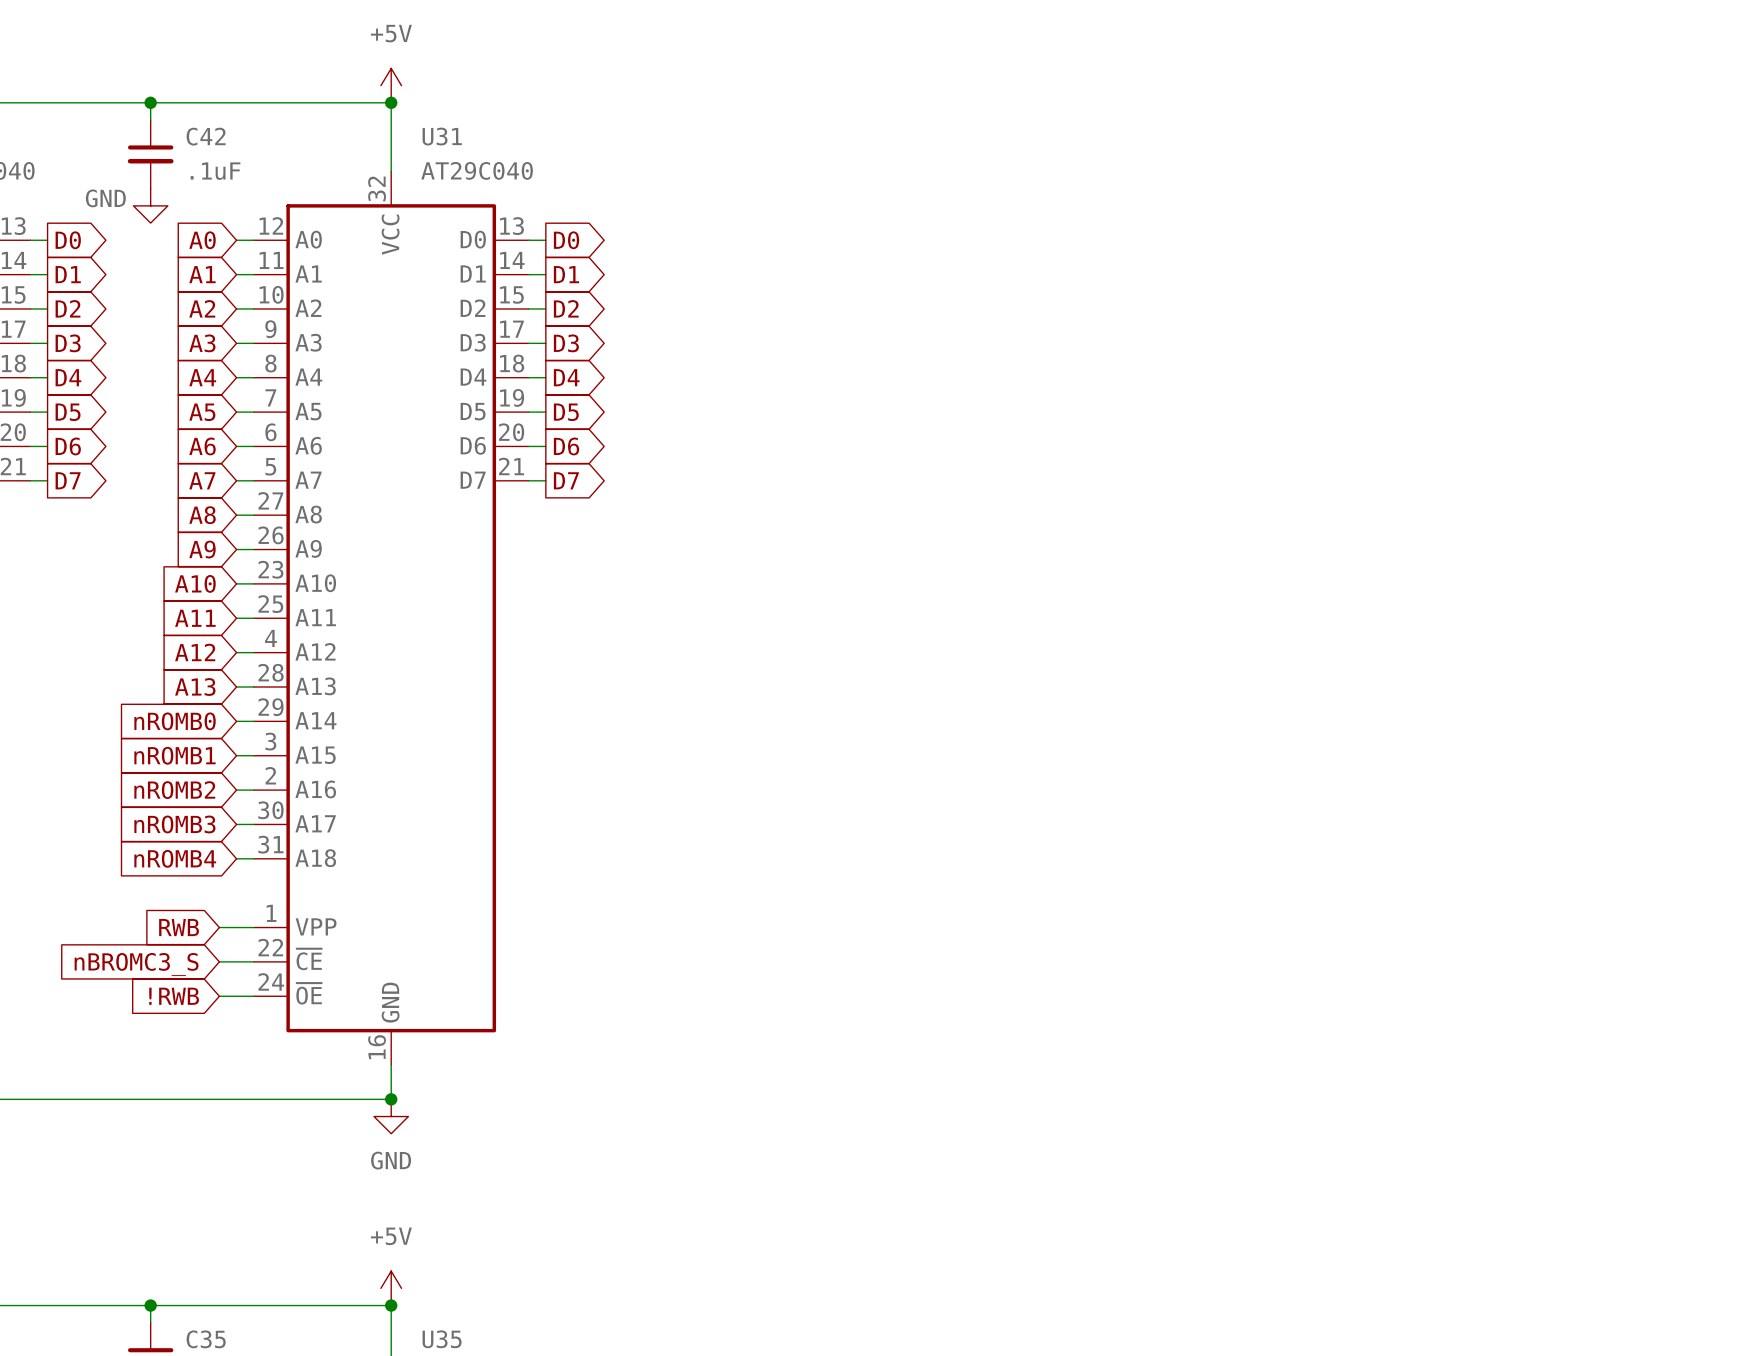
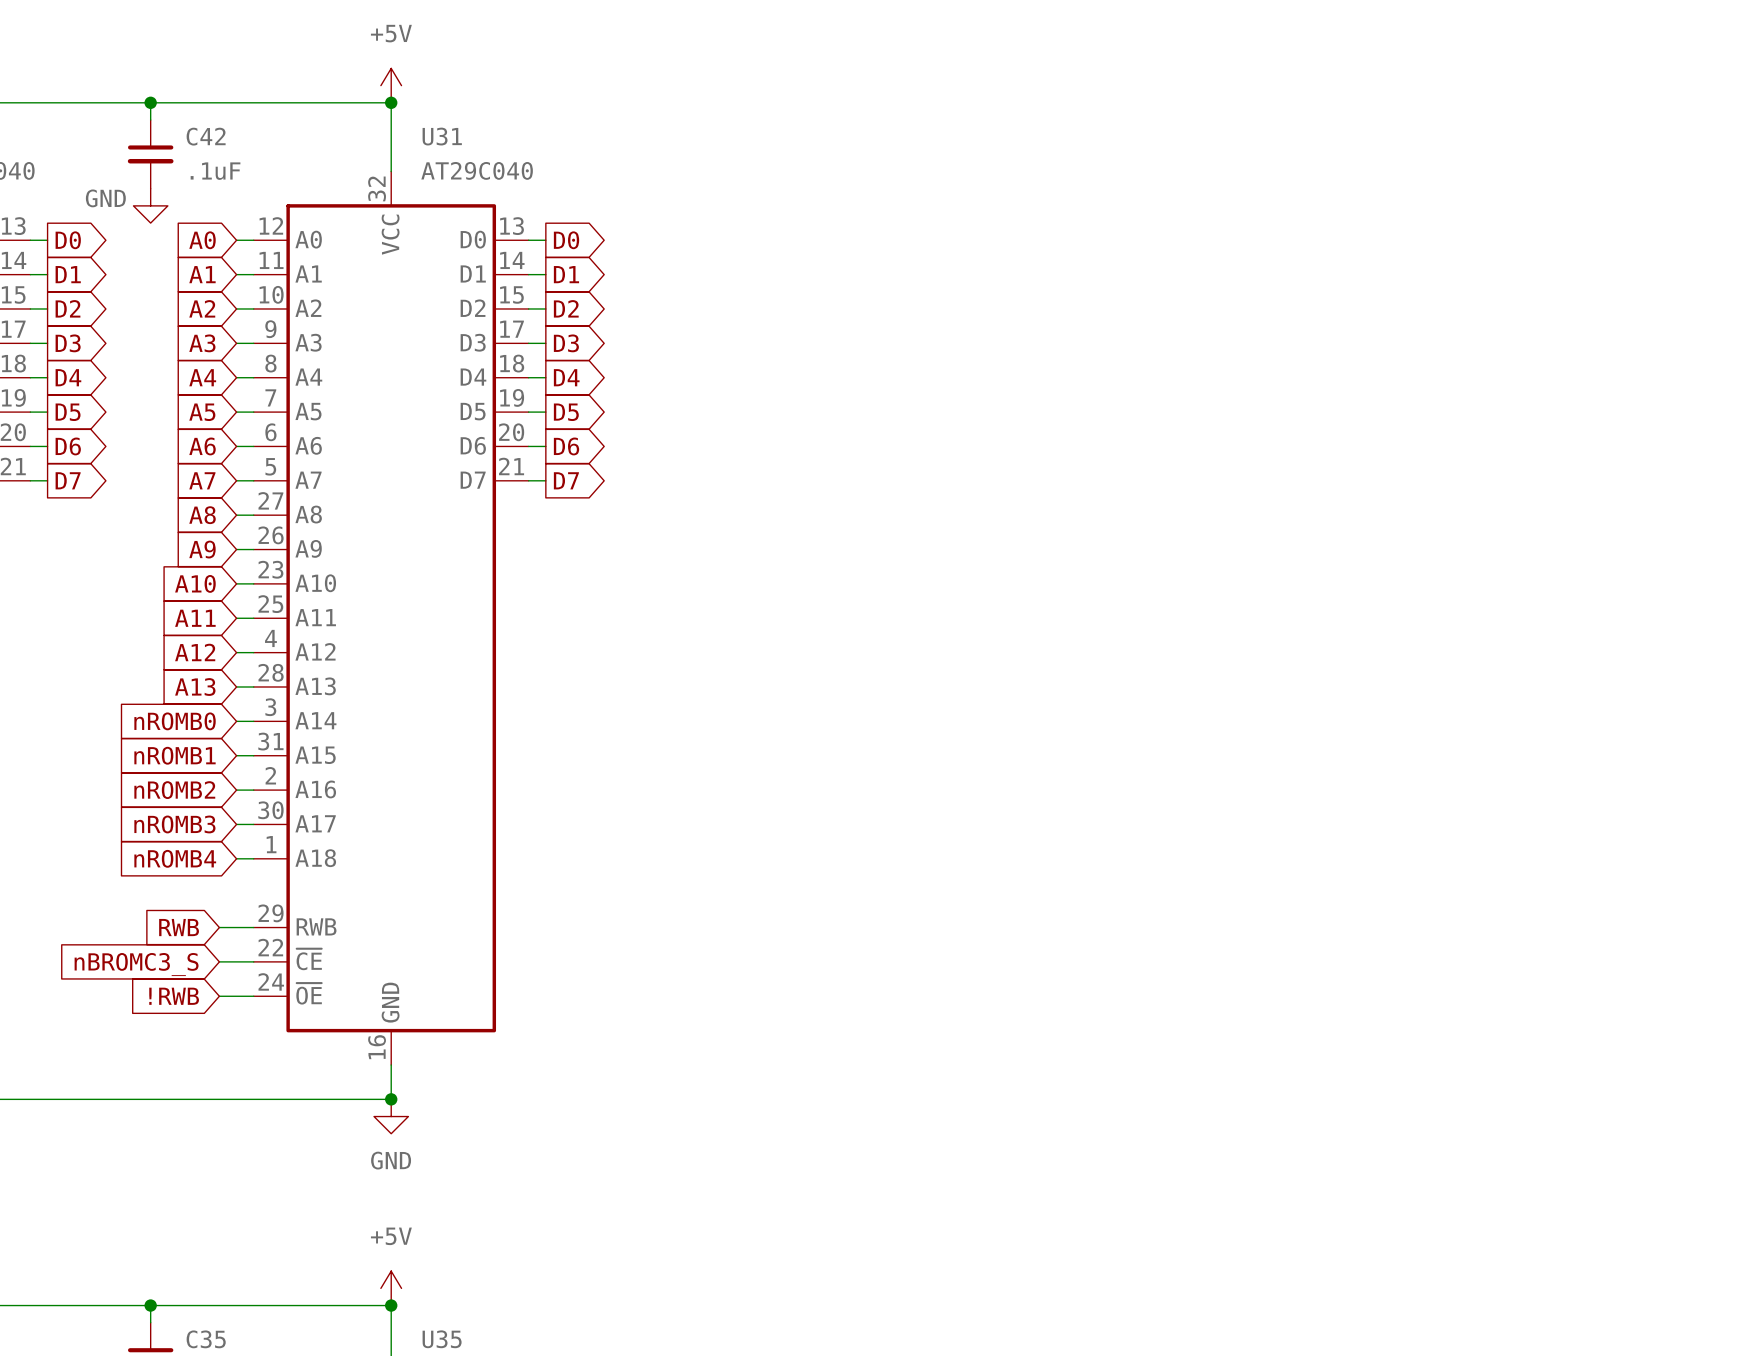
U31 pin number: 29 (271, 707) -> 3 (270, 707)
U31 pin number: 3 (270, 741) -> 31 (270, 741)
U31 pin number: 31 (270, 844) -> 1 (271, 844)
U31 pin number: 1 (271, 913) -> 29 (271, 913)
U31 pin name: VPP (316, 926) -> RWB (316, 926)

